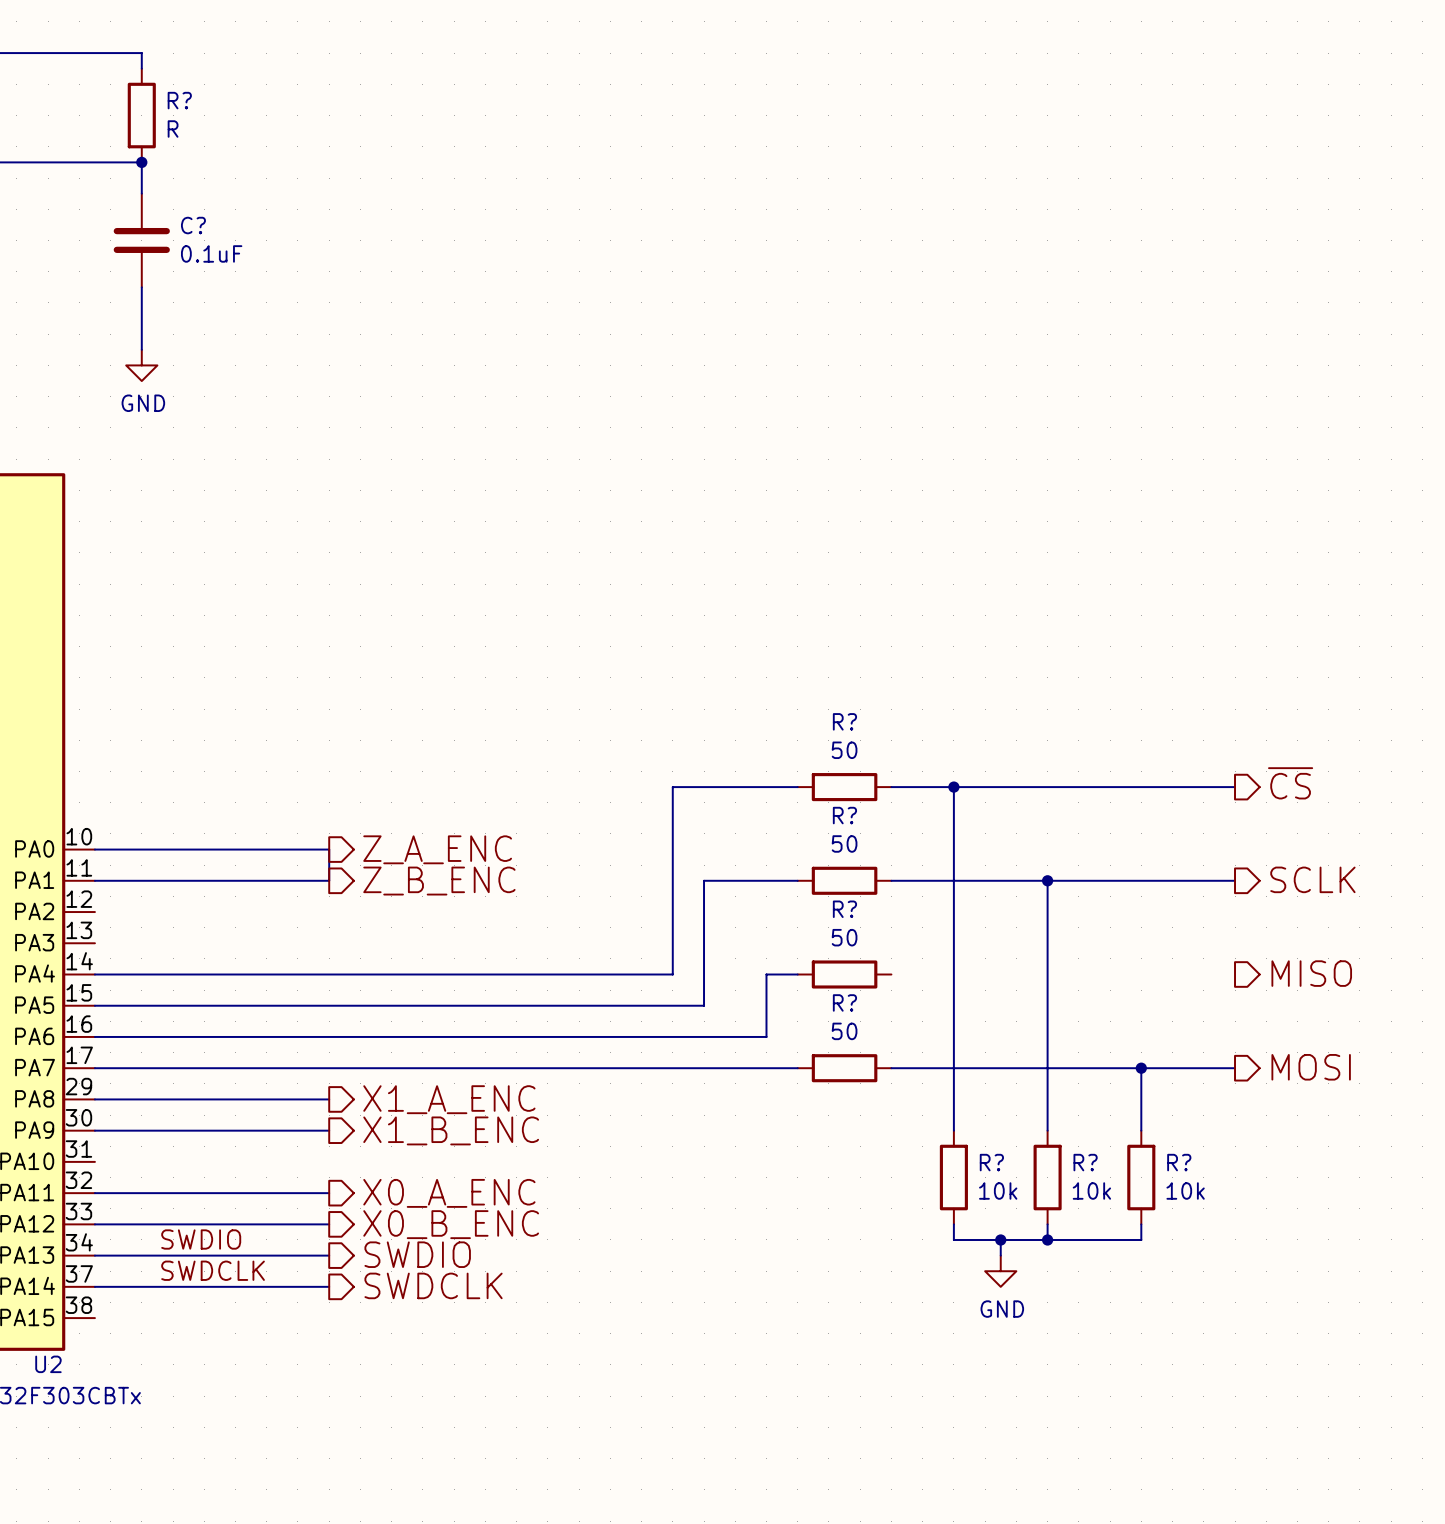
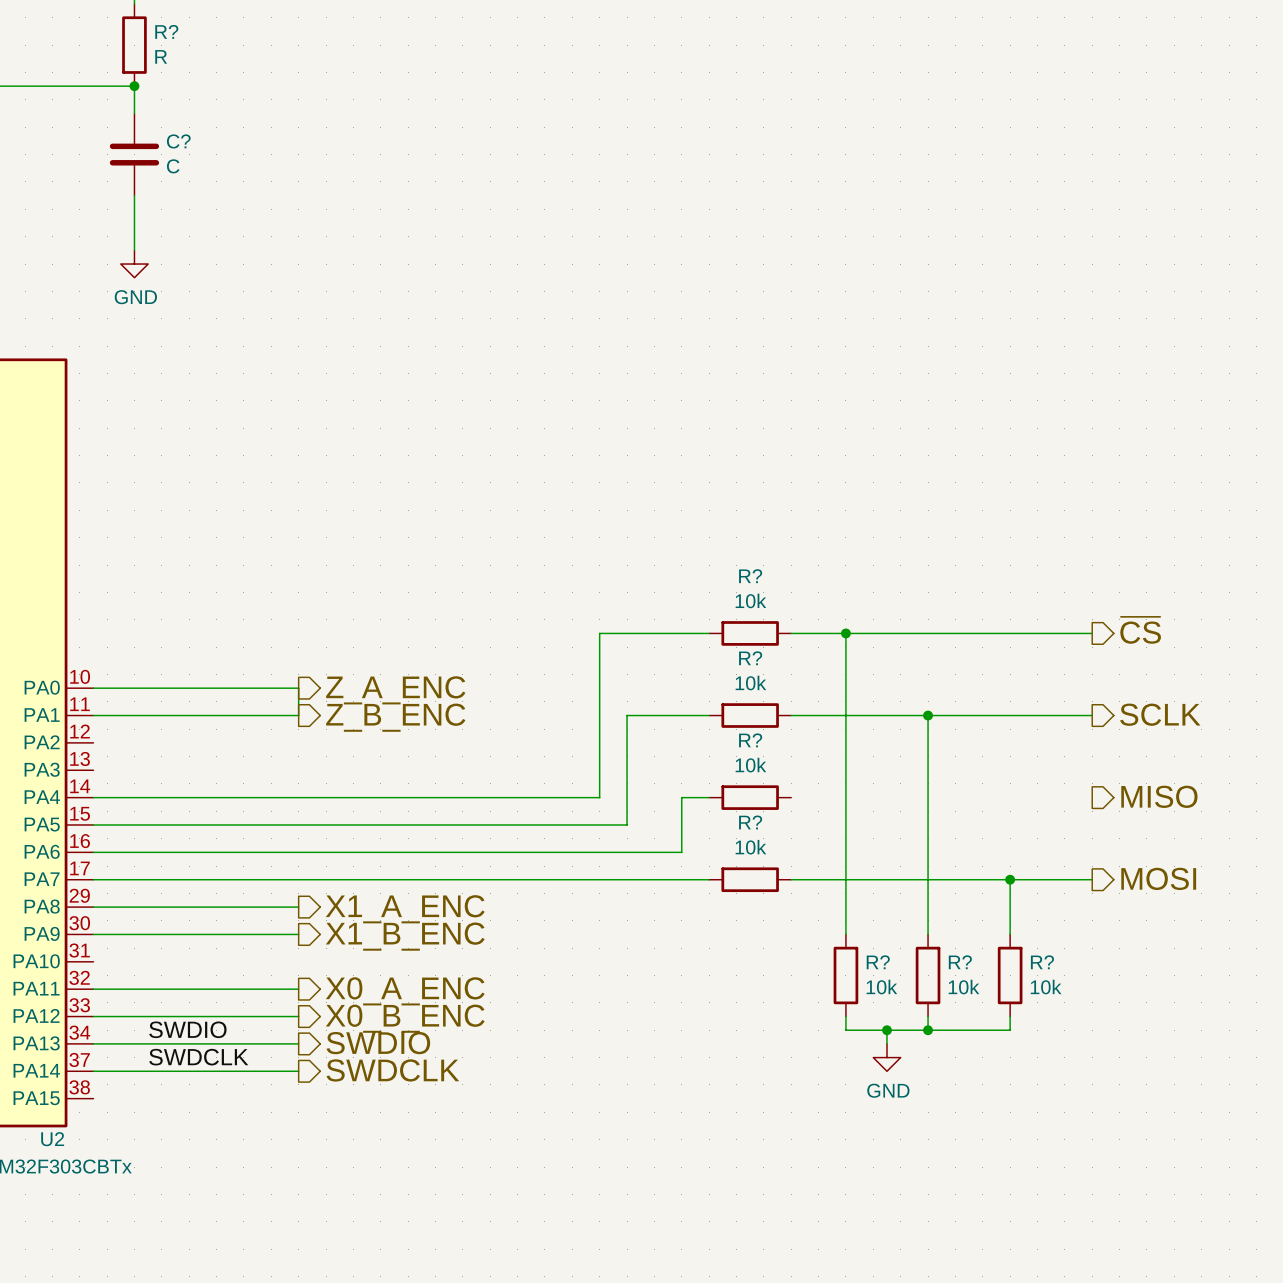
C? value: 0.1uF (211, 253) -> C (173, 166)
R? value: 50 (844, 750) -> 10k (750, 600)
R? value: 50 (844, 843) -> 10k (750, 683)
R? value: 50 (844, 937) -> 10k (750, 765)
R? value: 50 (844, 1031) -> 10k (750, 847)

